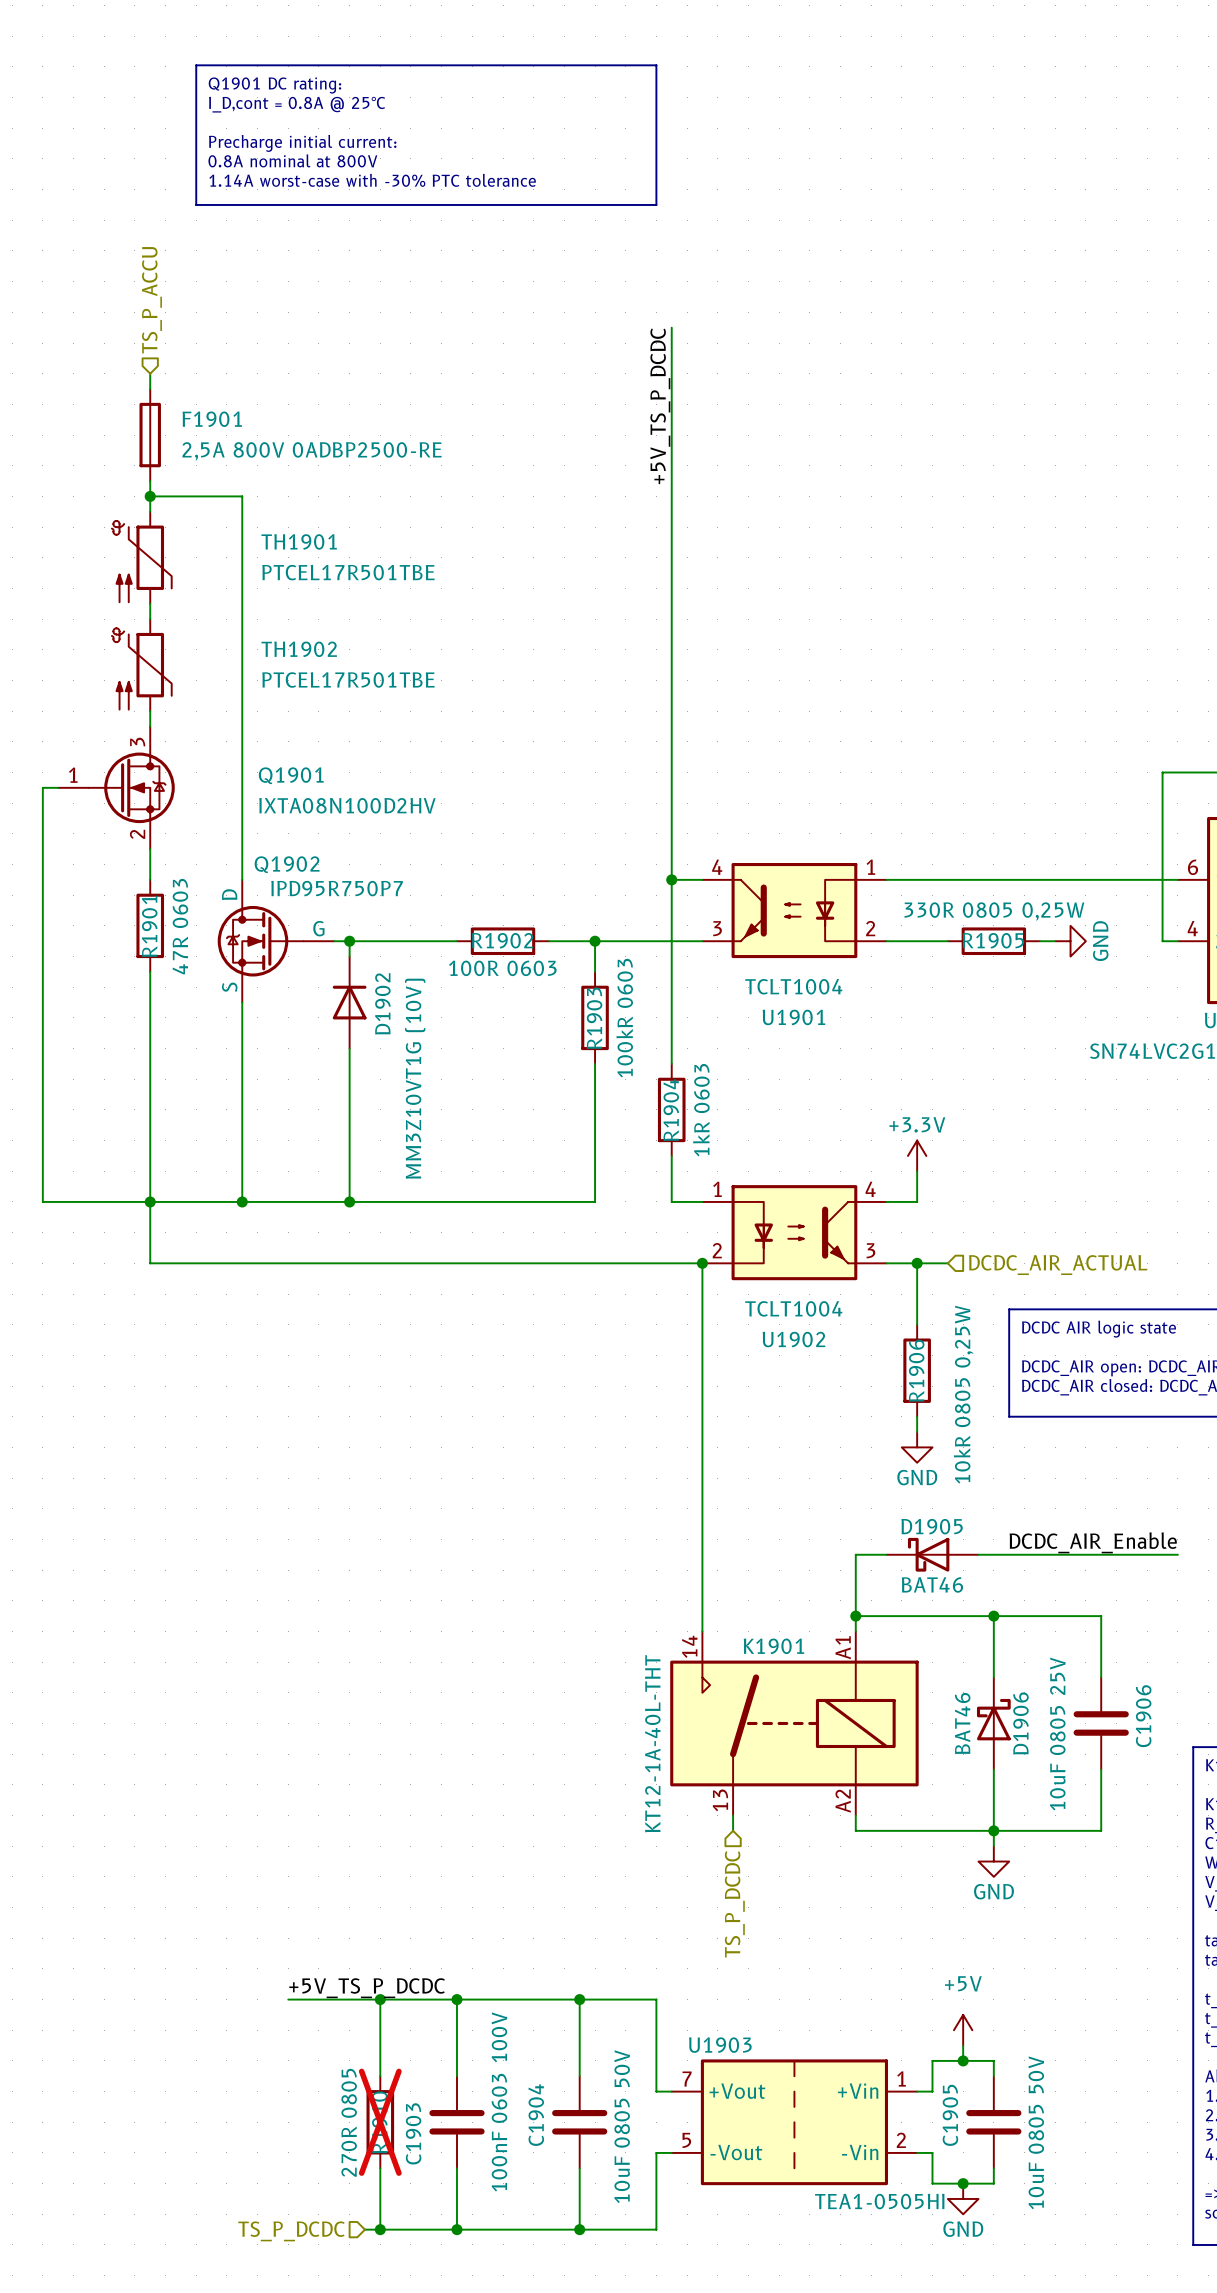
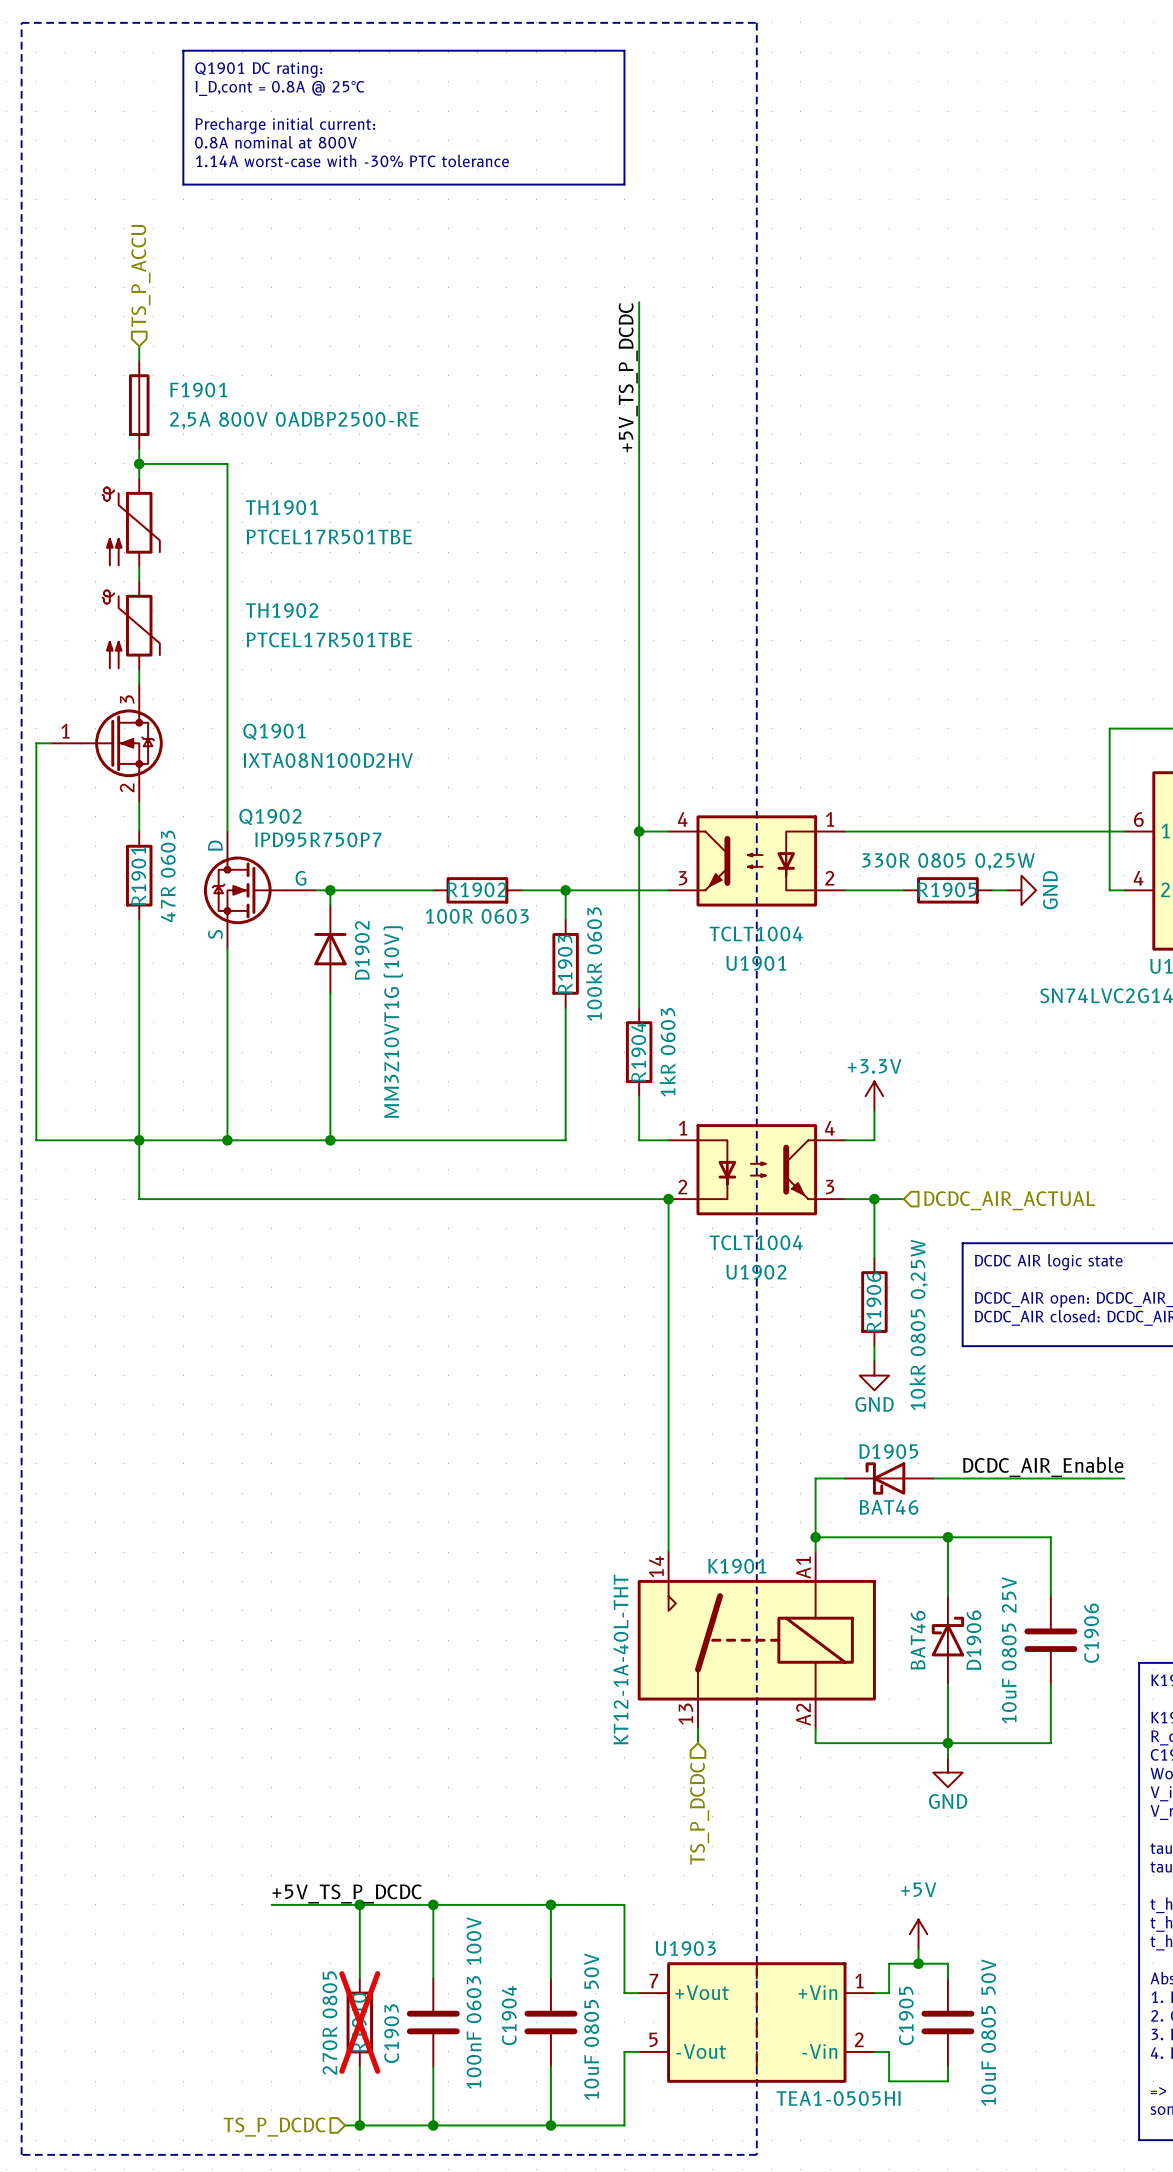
line: none -> (21, 22) (756, 22) (756, 2154) (21, 2154) (21, 22)
junction: (963, 2183) -> none
power symbol: GND (963, 2198) -> none

